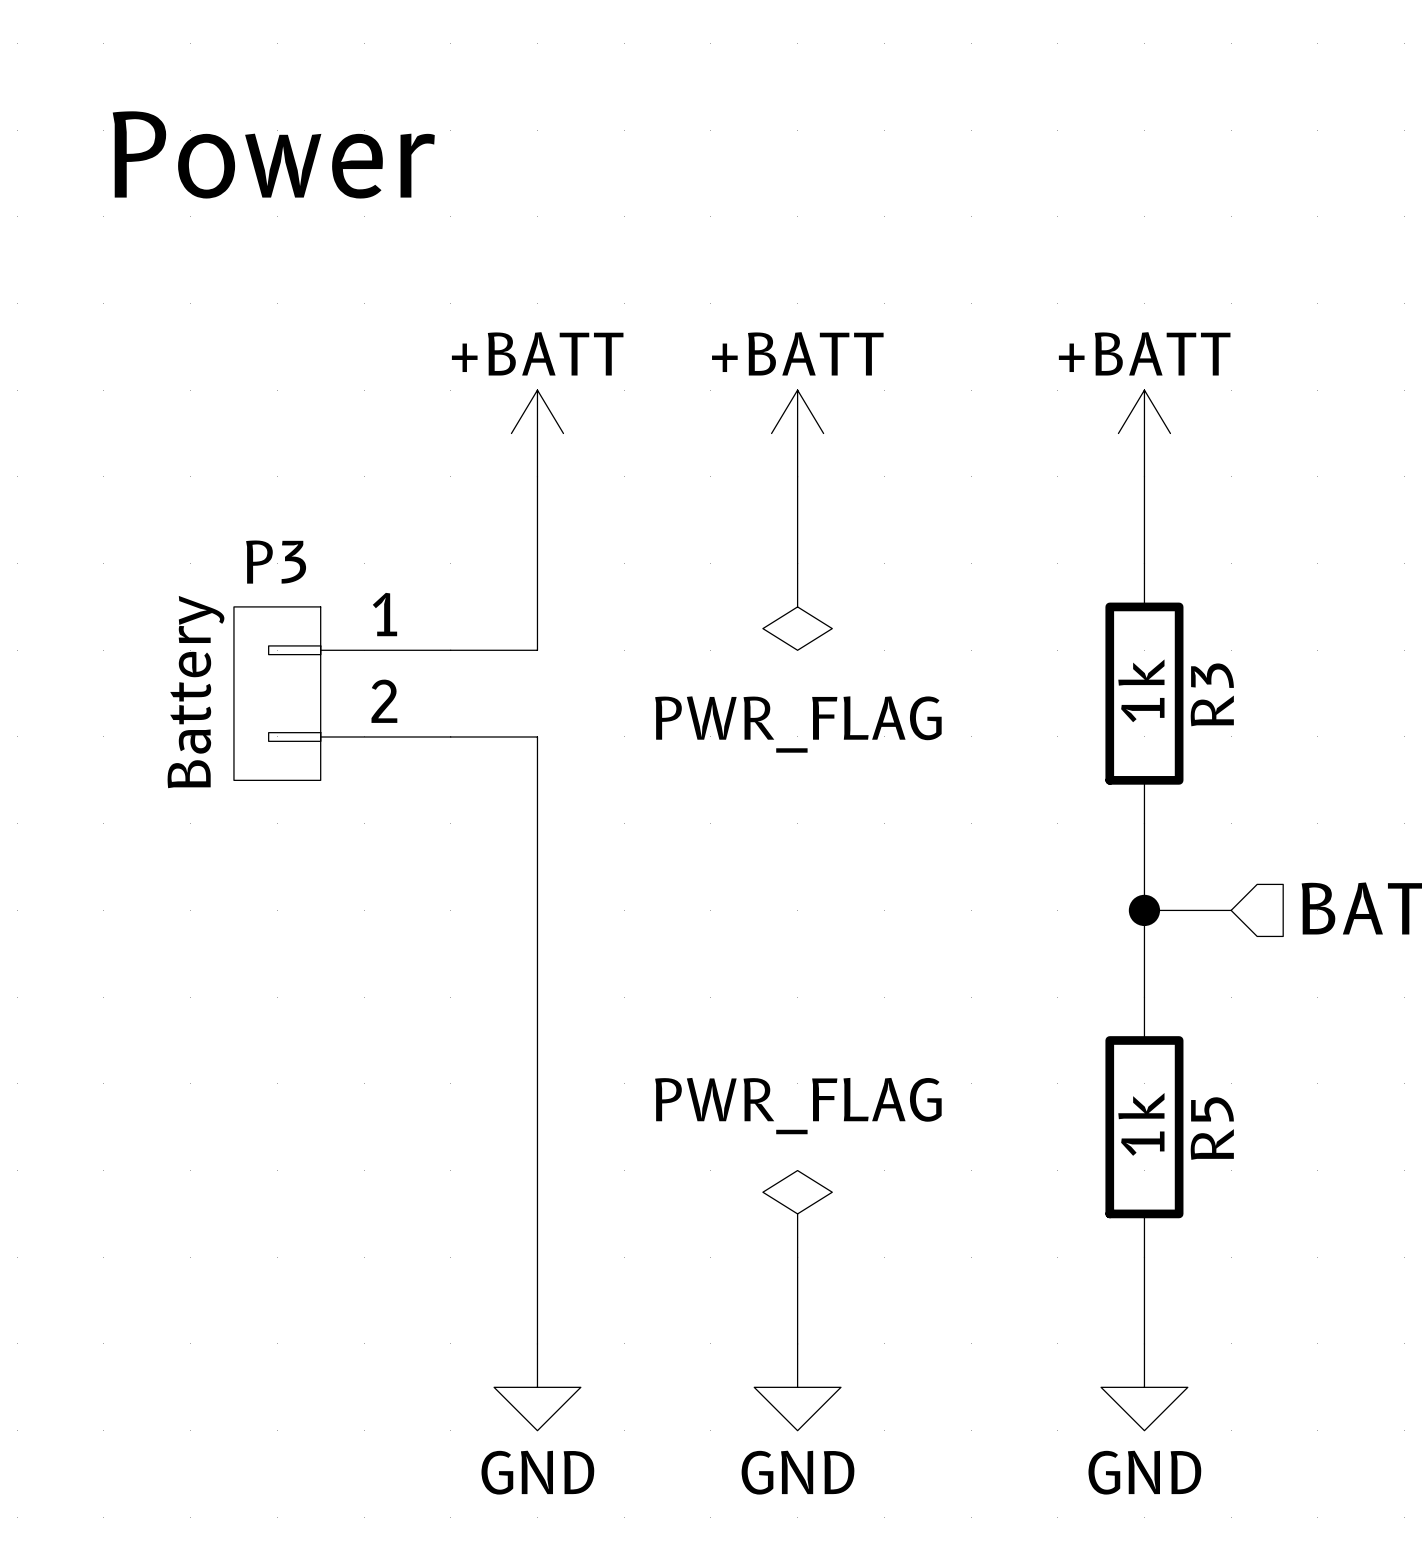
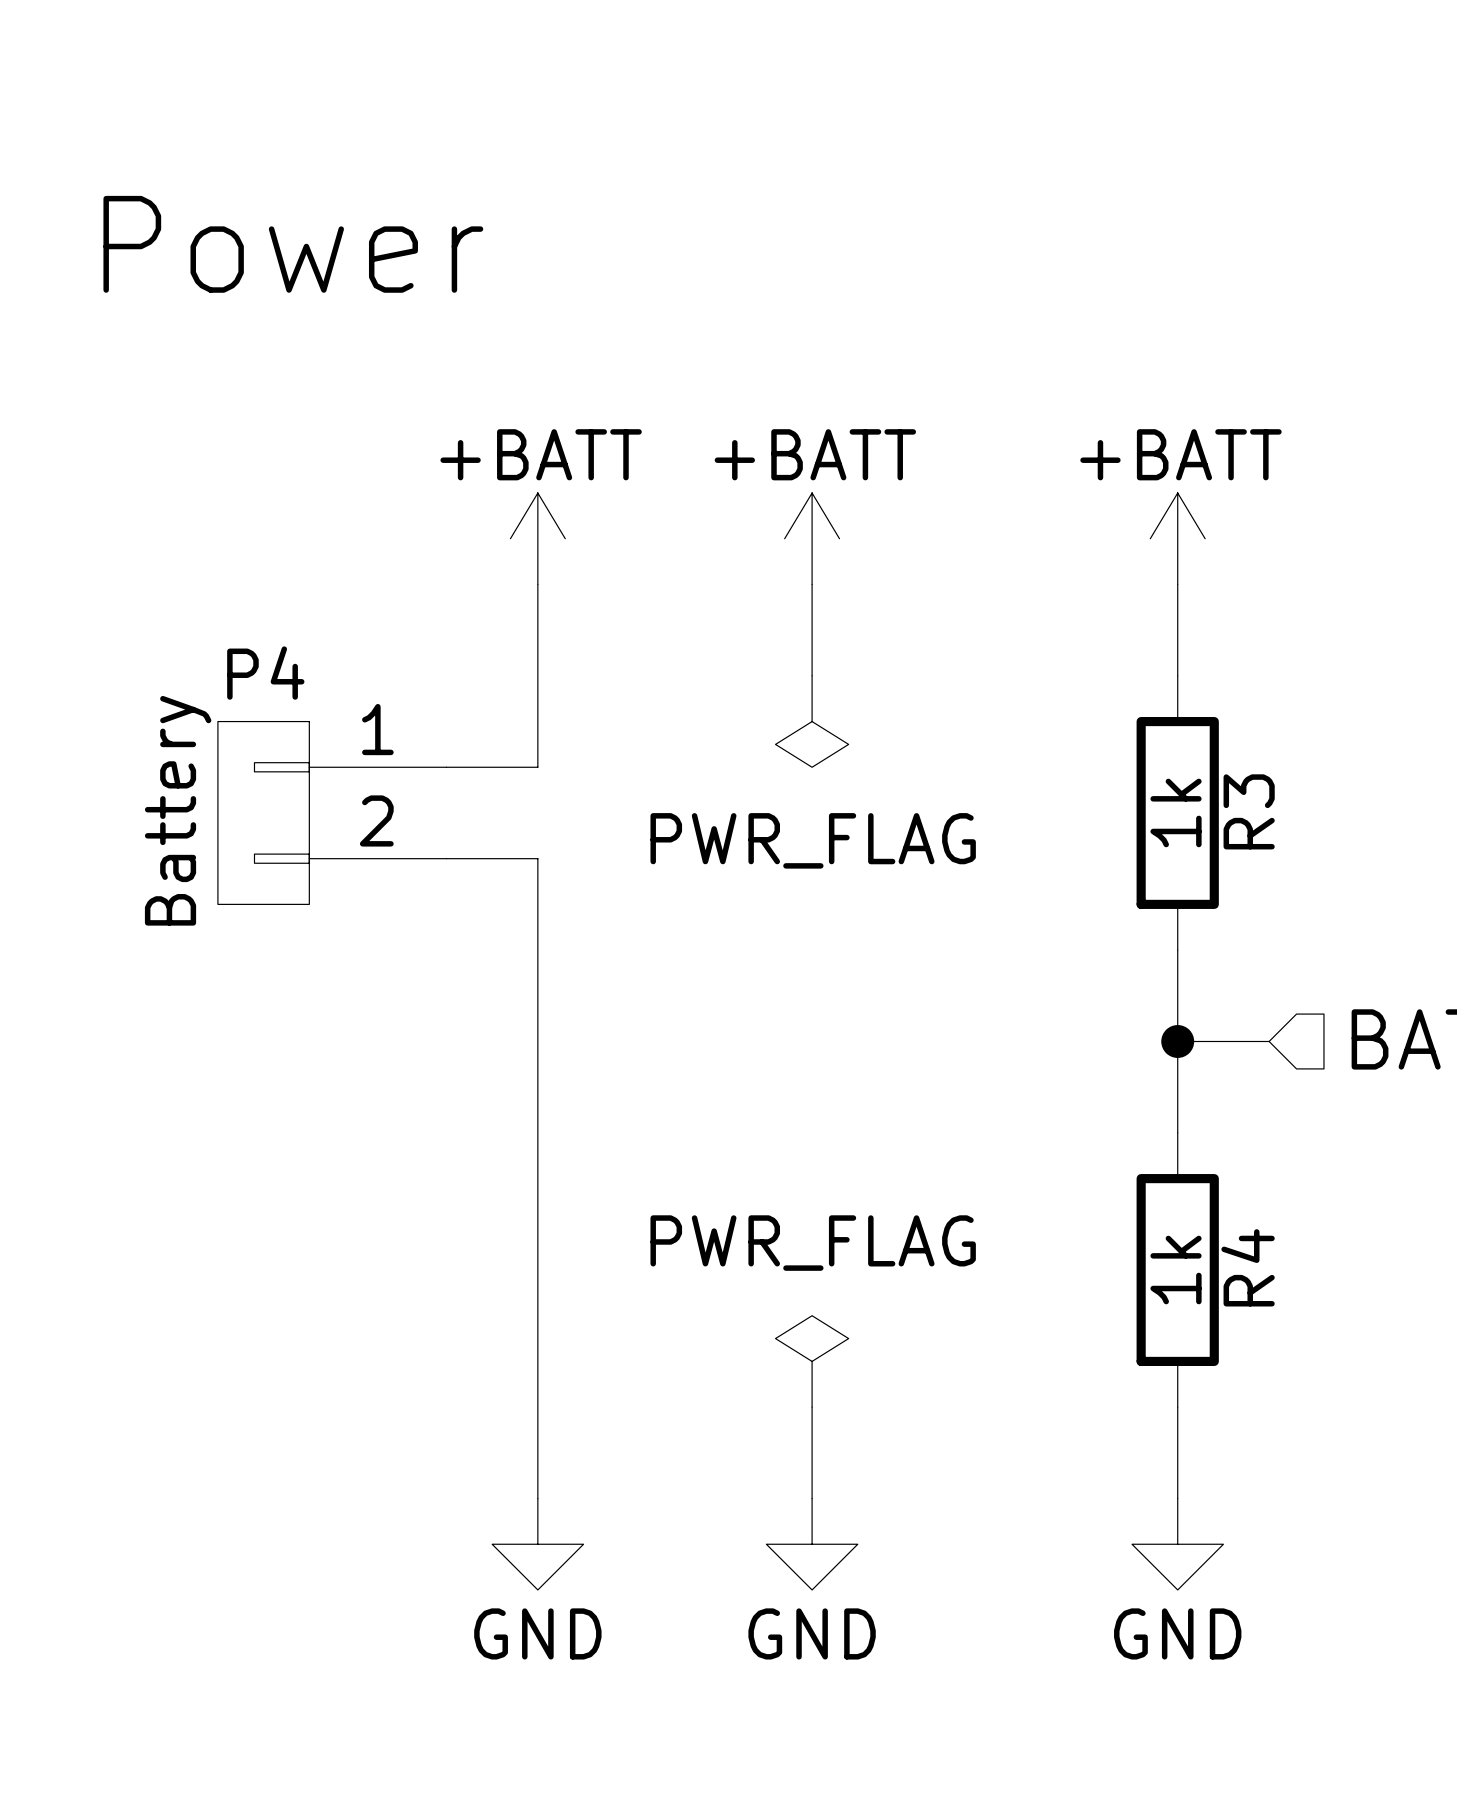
P3 name: P3 (276, 562) -> P4 (265, 673)
R5 name: R5 (1212, 1128) -> R4 (1248, 1267)

